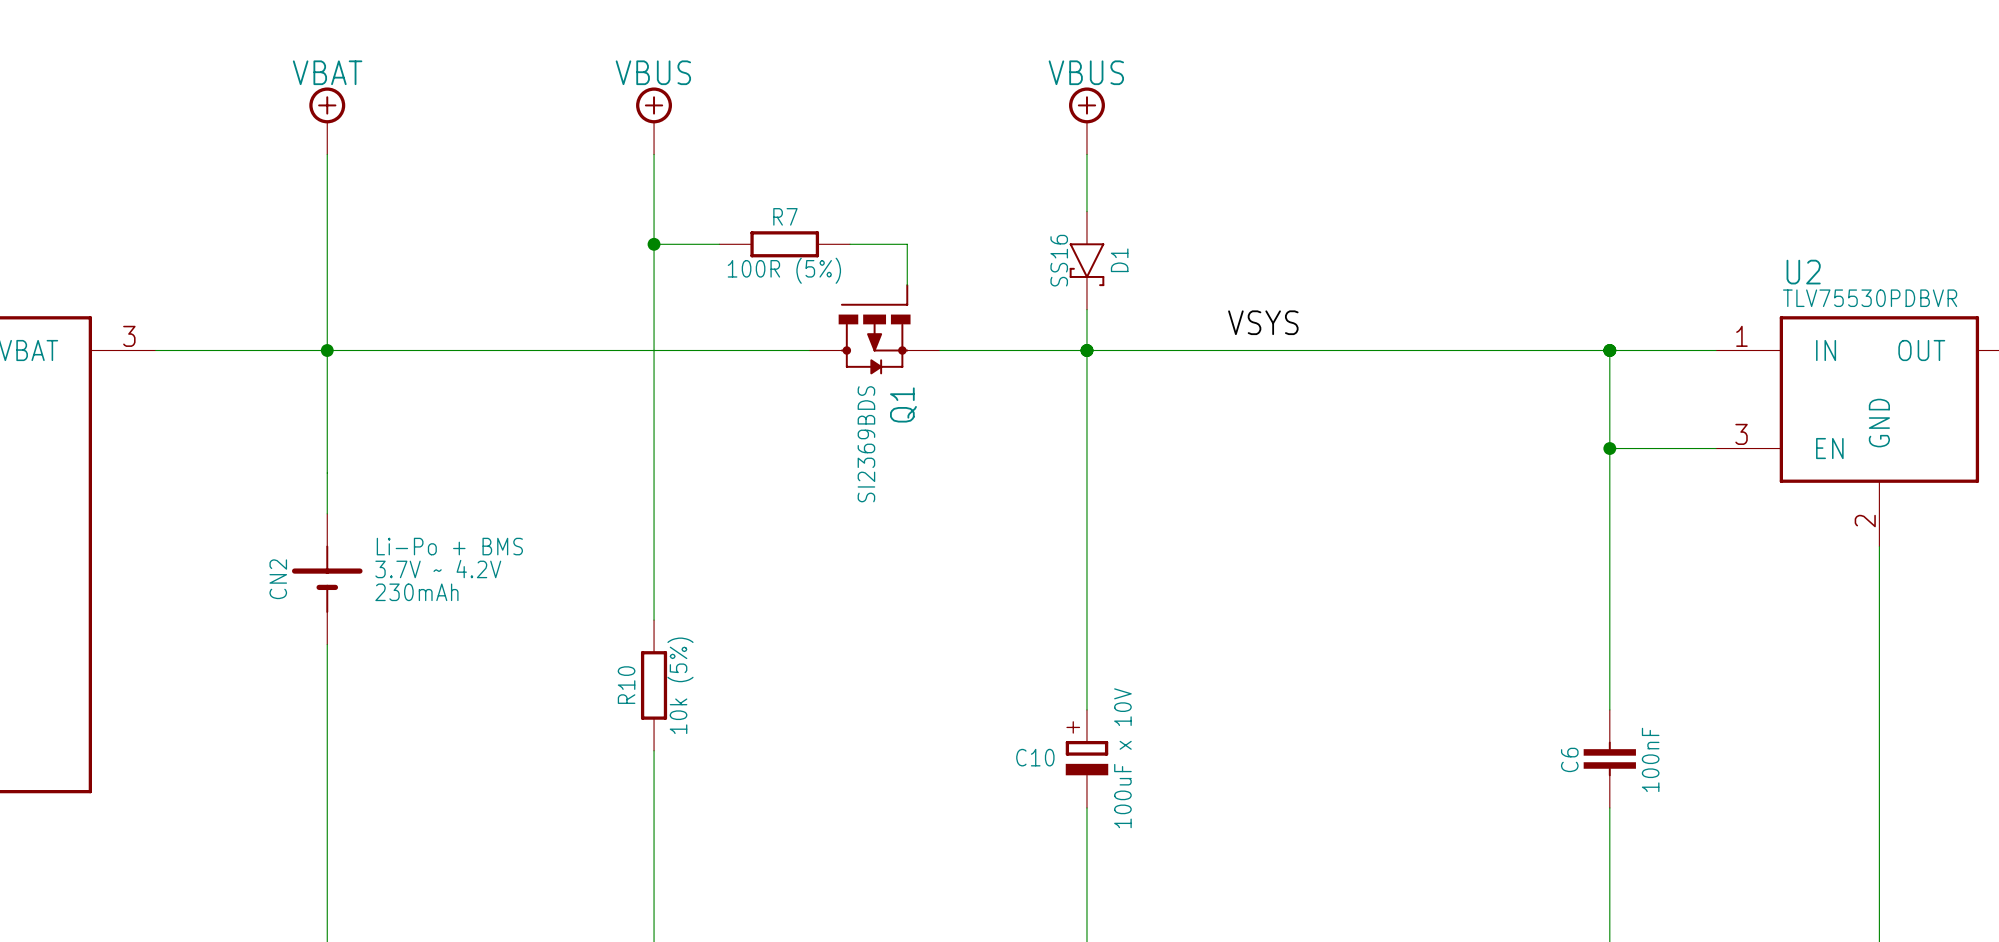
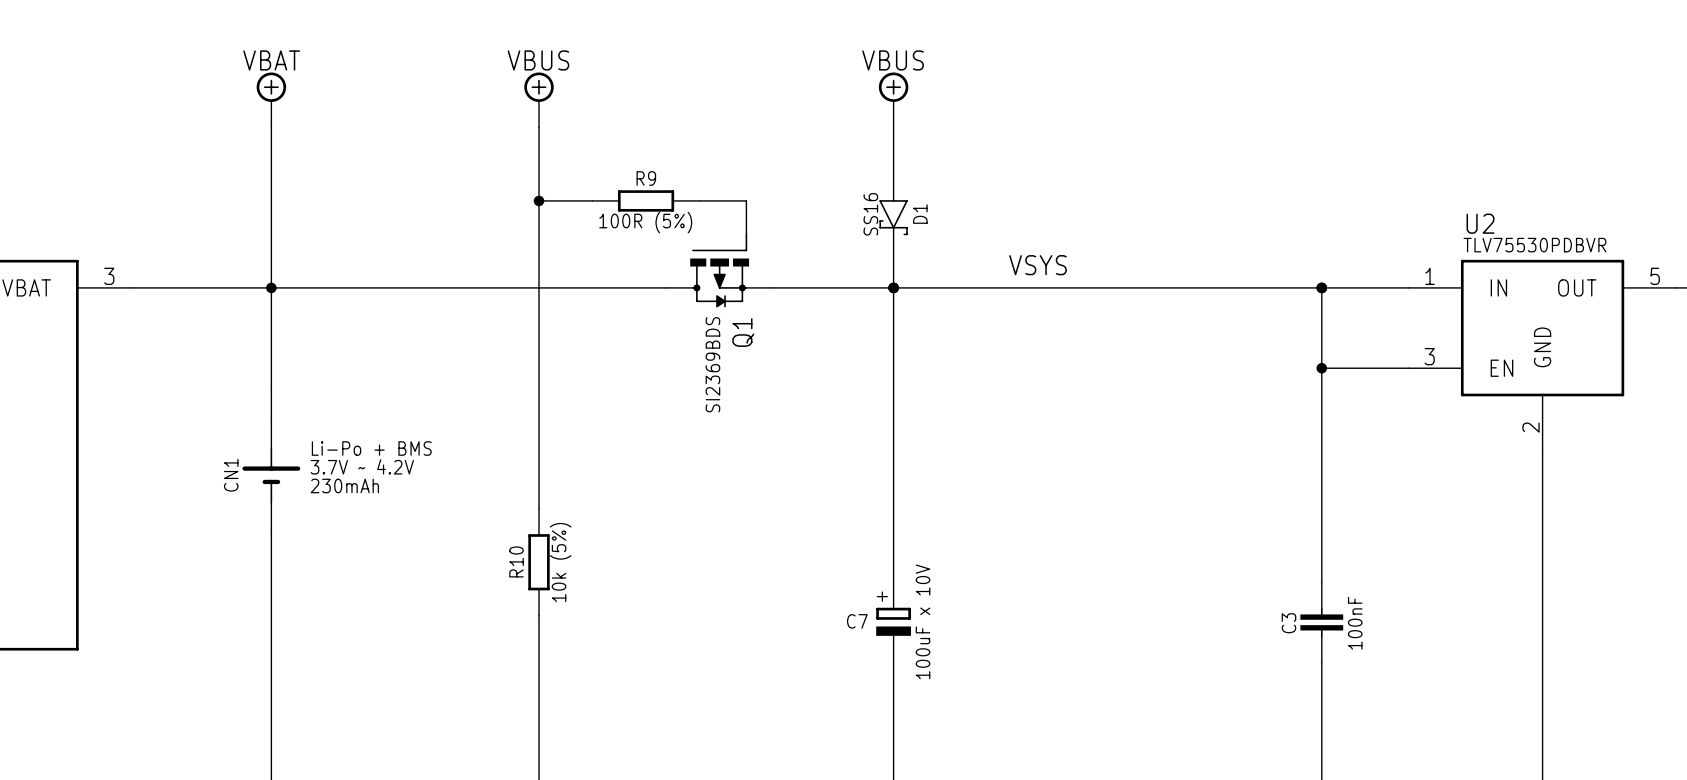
R7 name: R7 (785, 216) -> R9 (646, 178)
CN2 name: CN2 (278, 579) -> CN1 (231, 475)
C10 name: C10 (1035, 757) -> C7 (857, 621)
C6 name: C6 (1569, 759) -> C3 (1289, 623)

